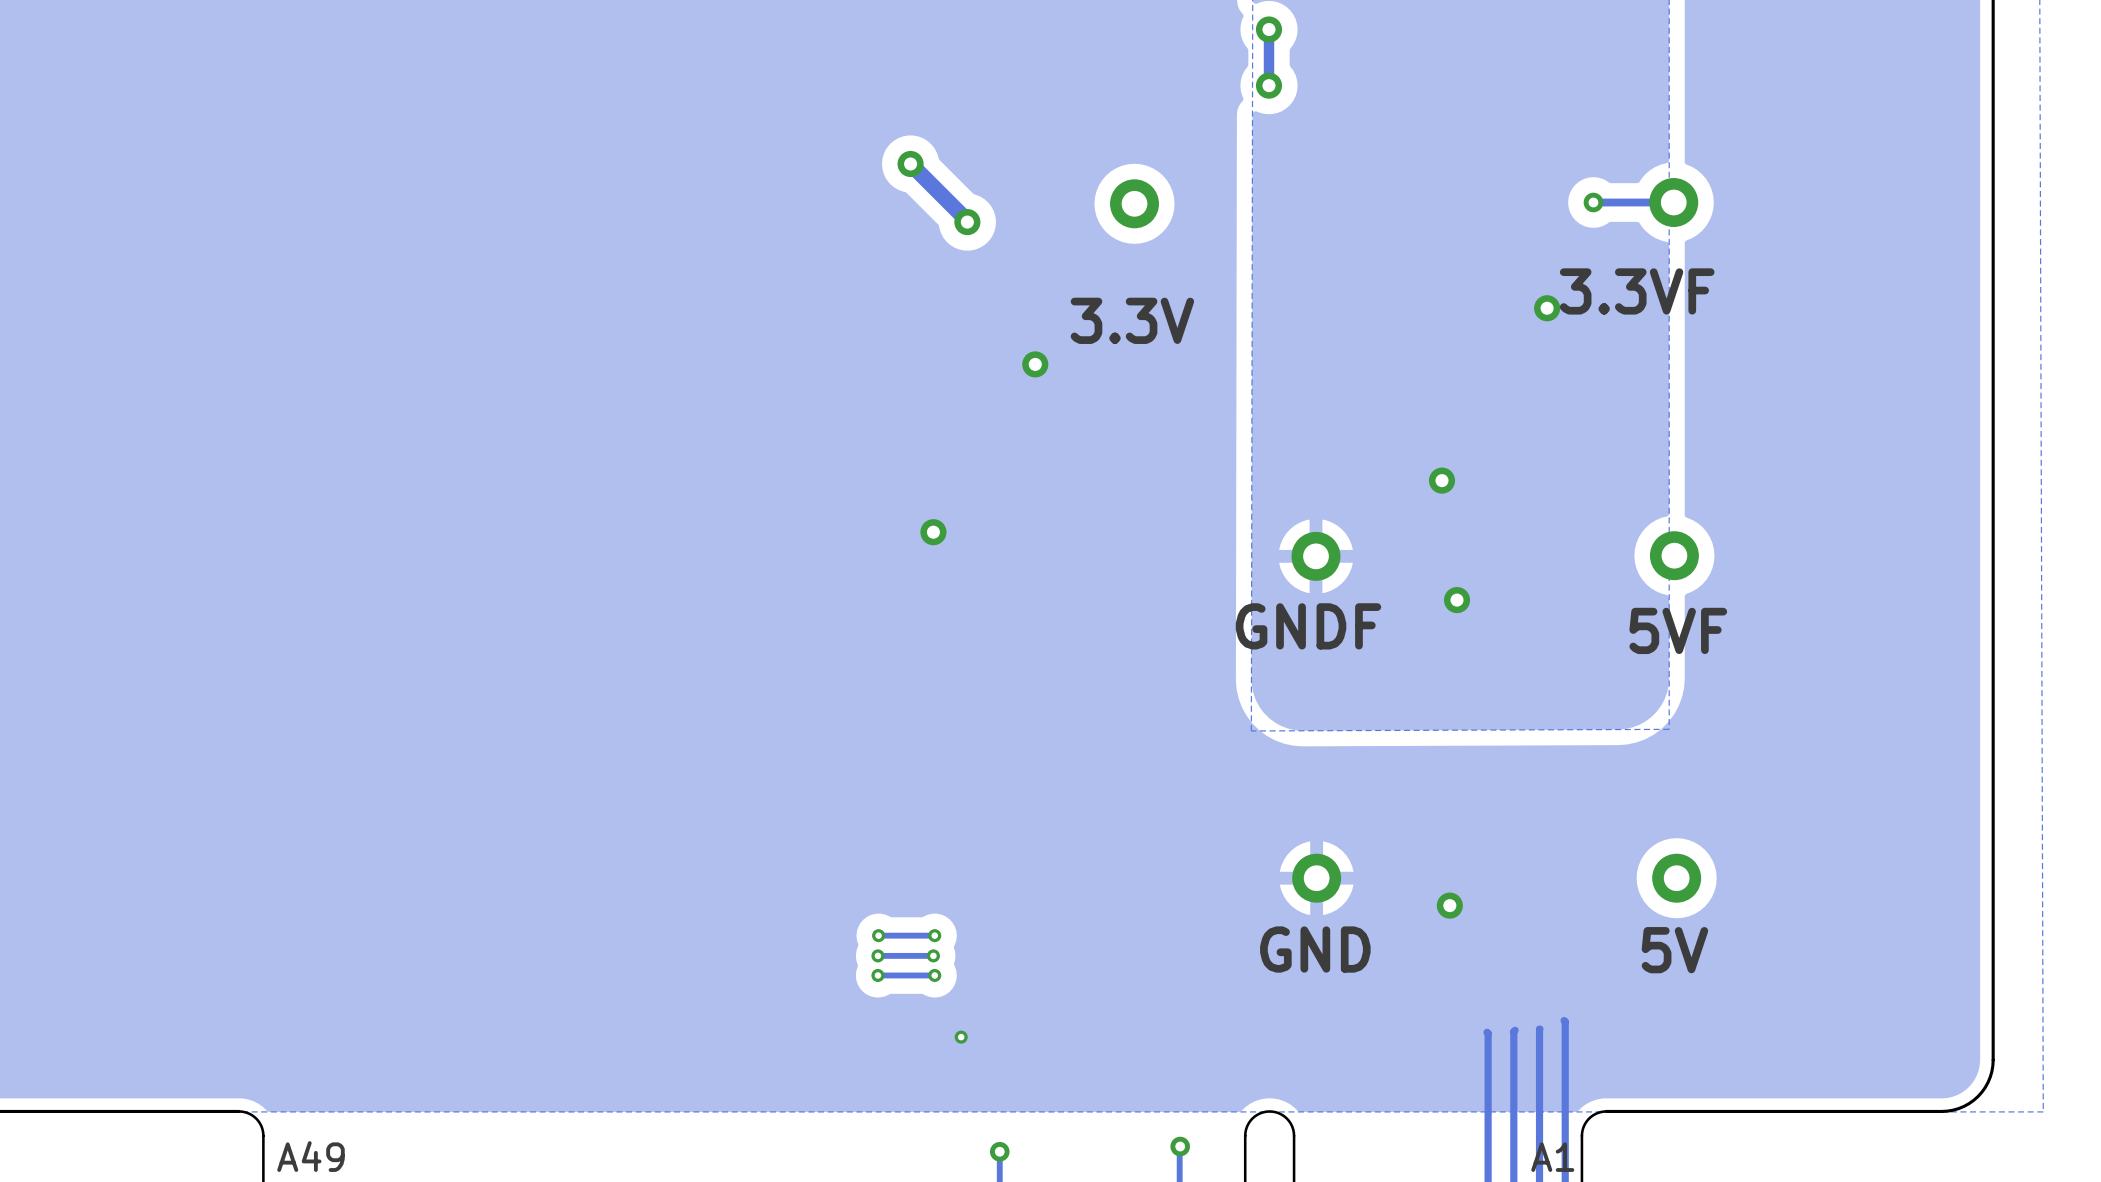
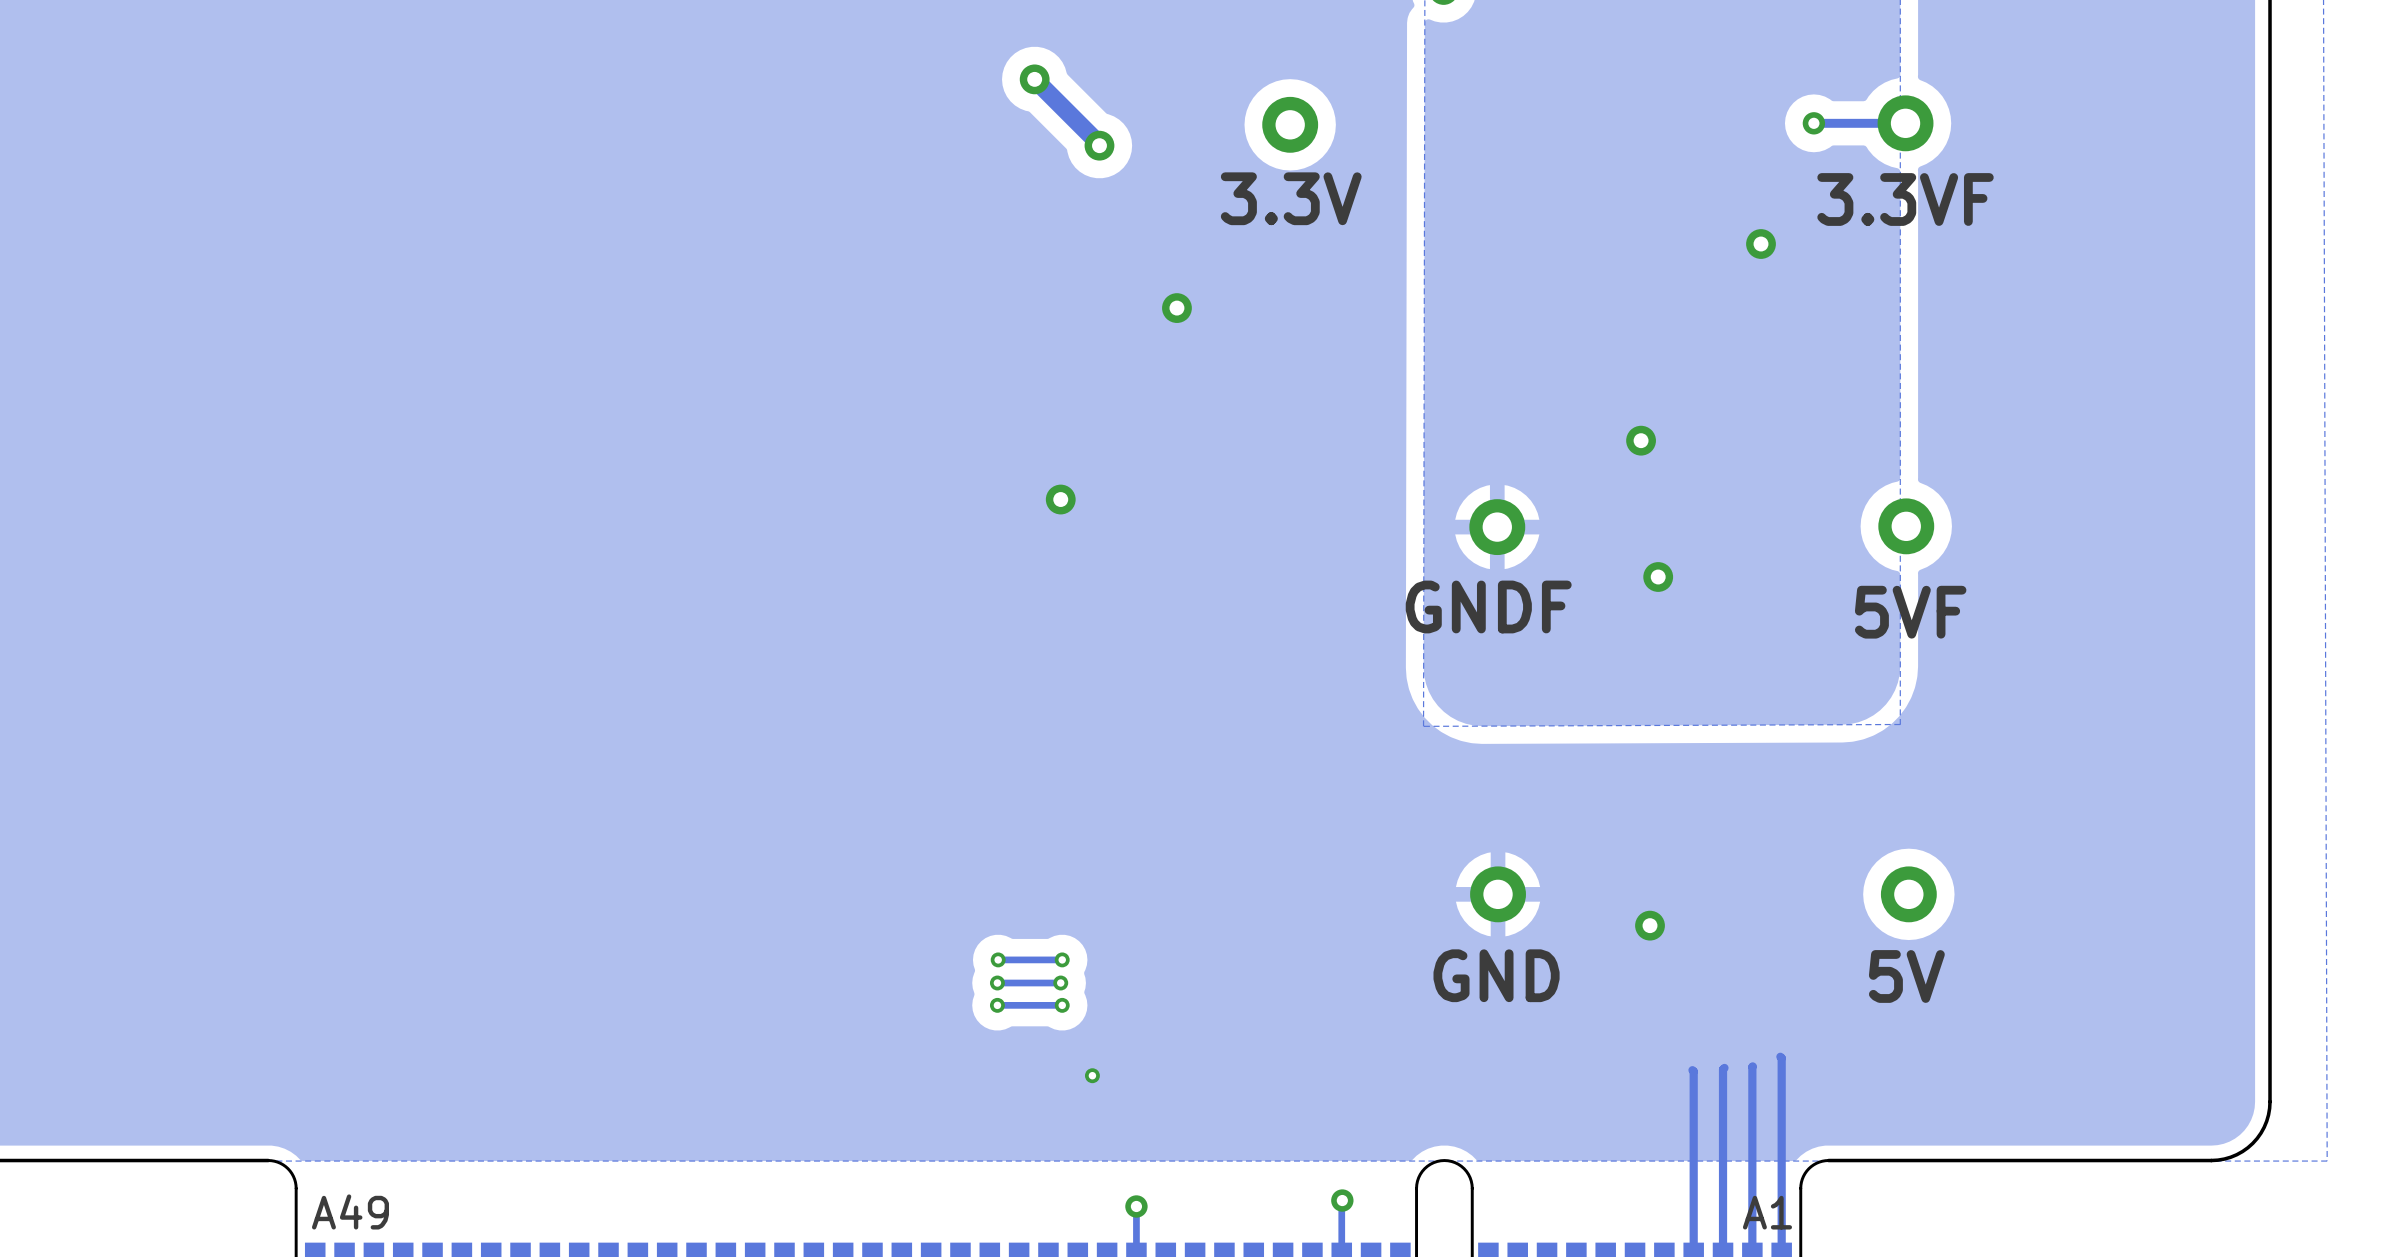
text position: 3.3VF (1637, 291) -> 3.3VF (1905, 199)
text position: 3.3V (1132, 320) -> 3.3V (1291, 198)

